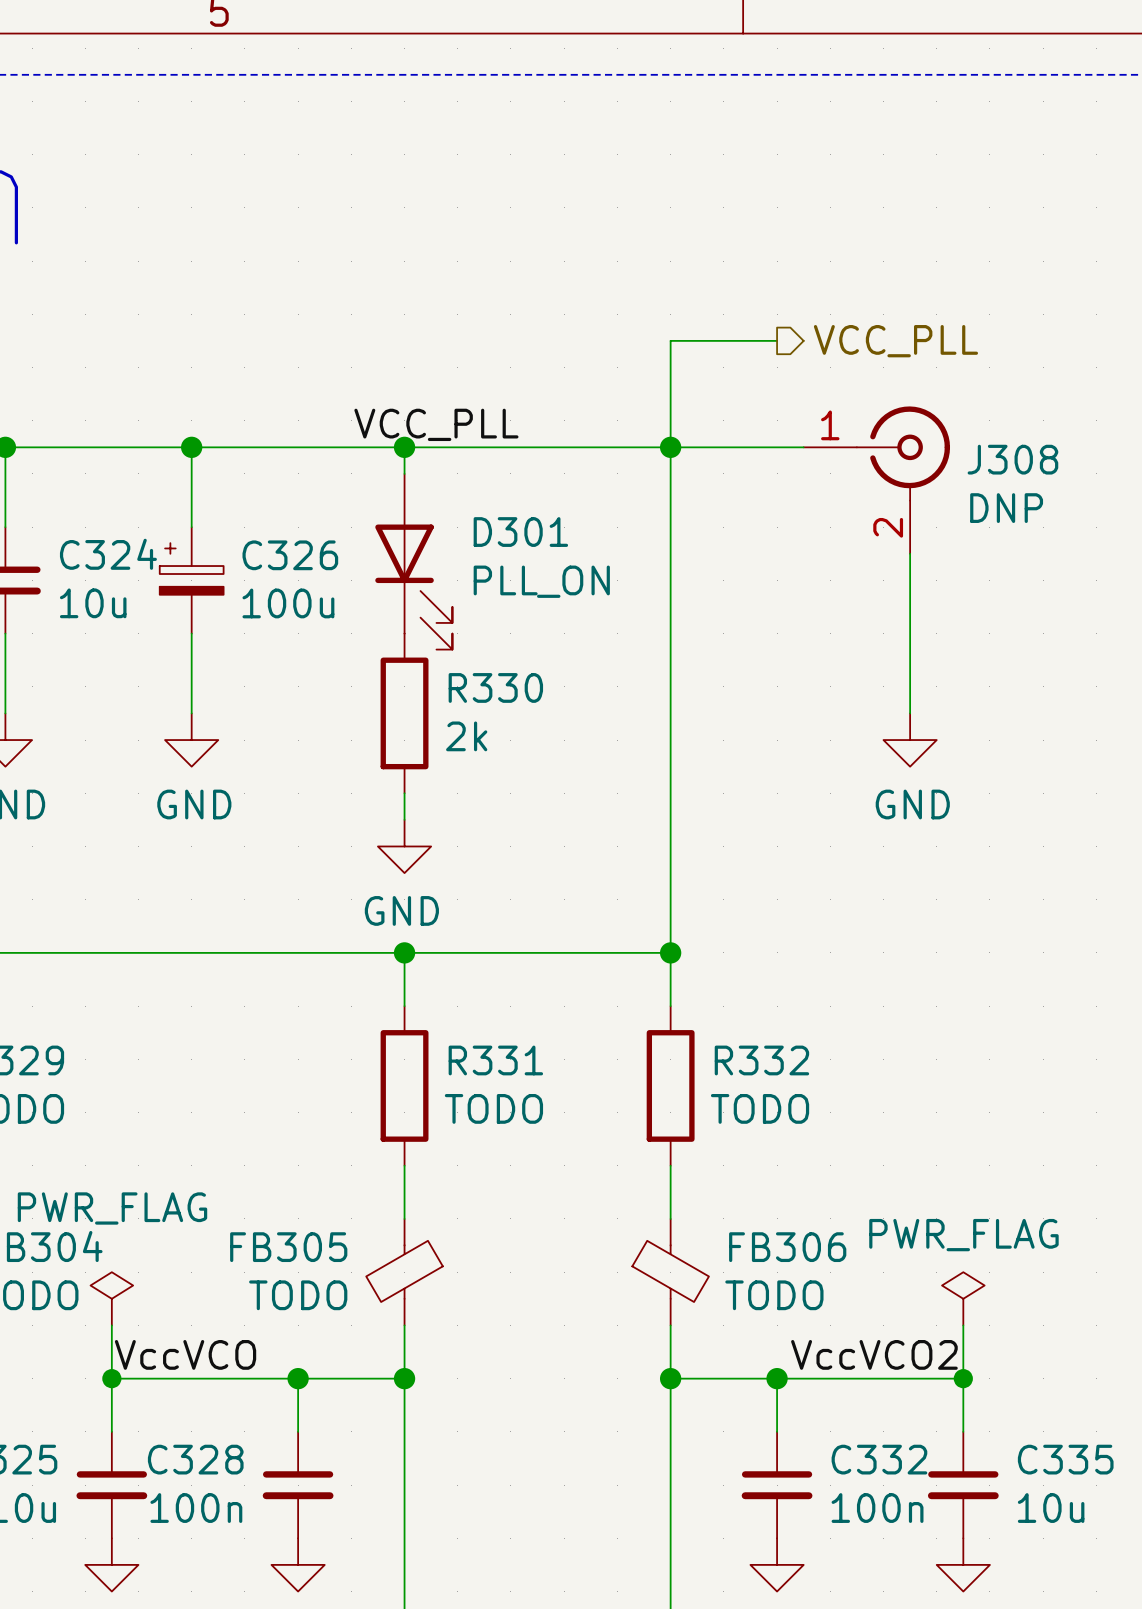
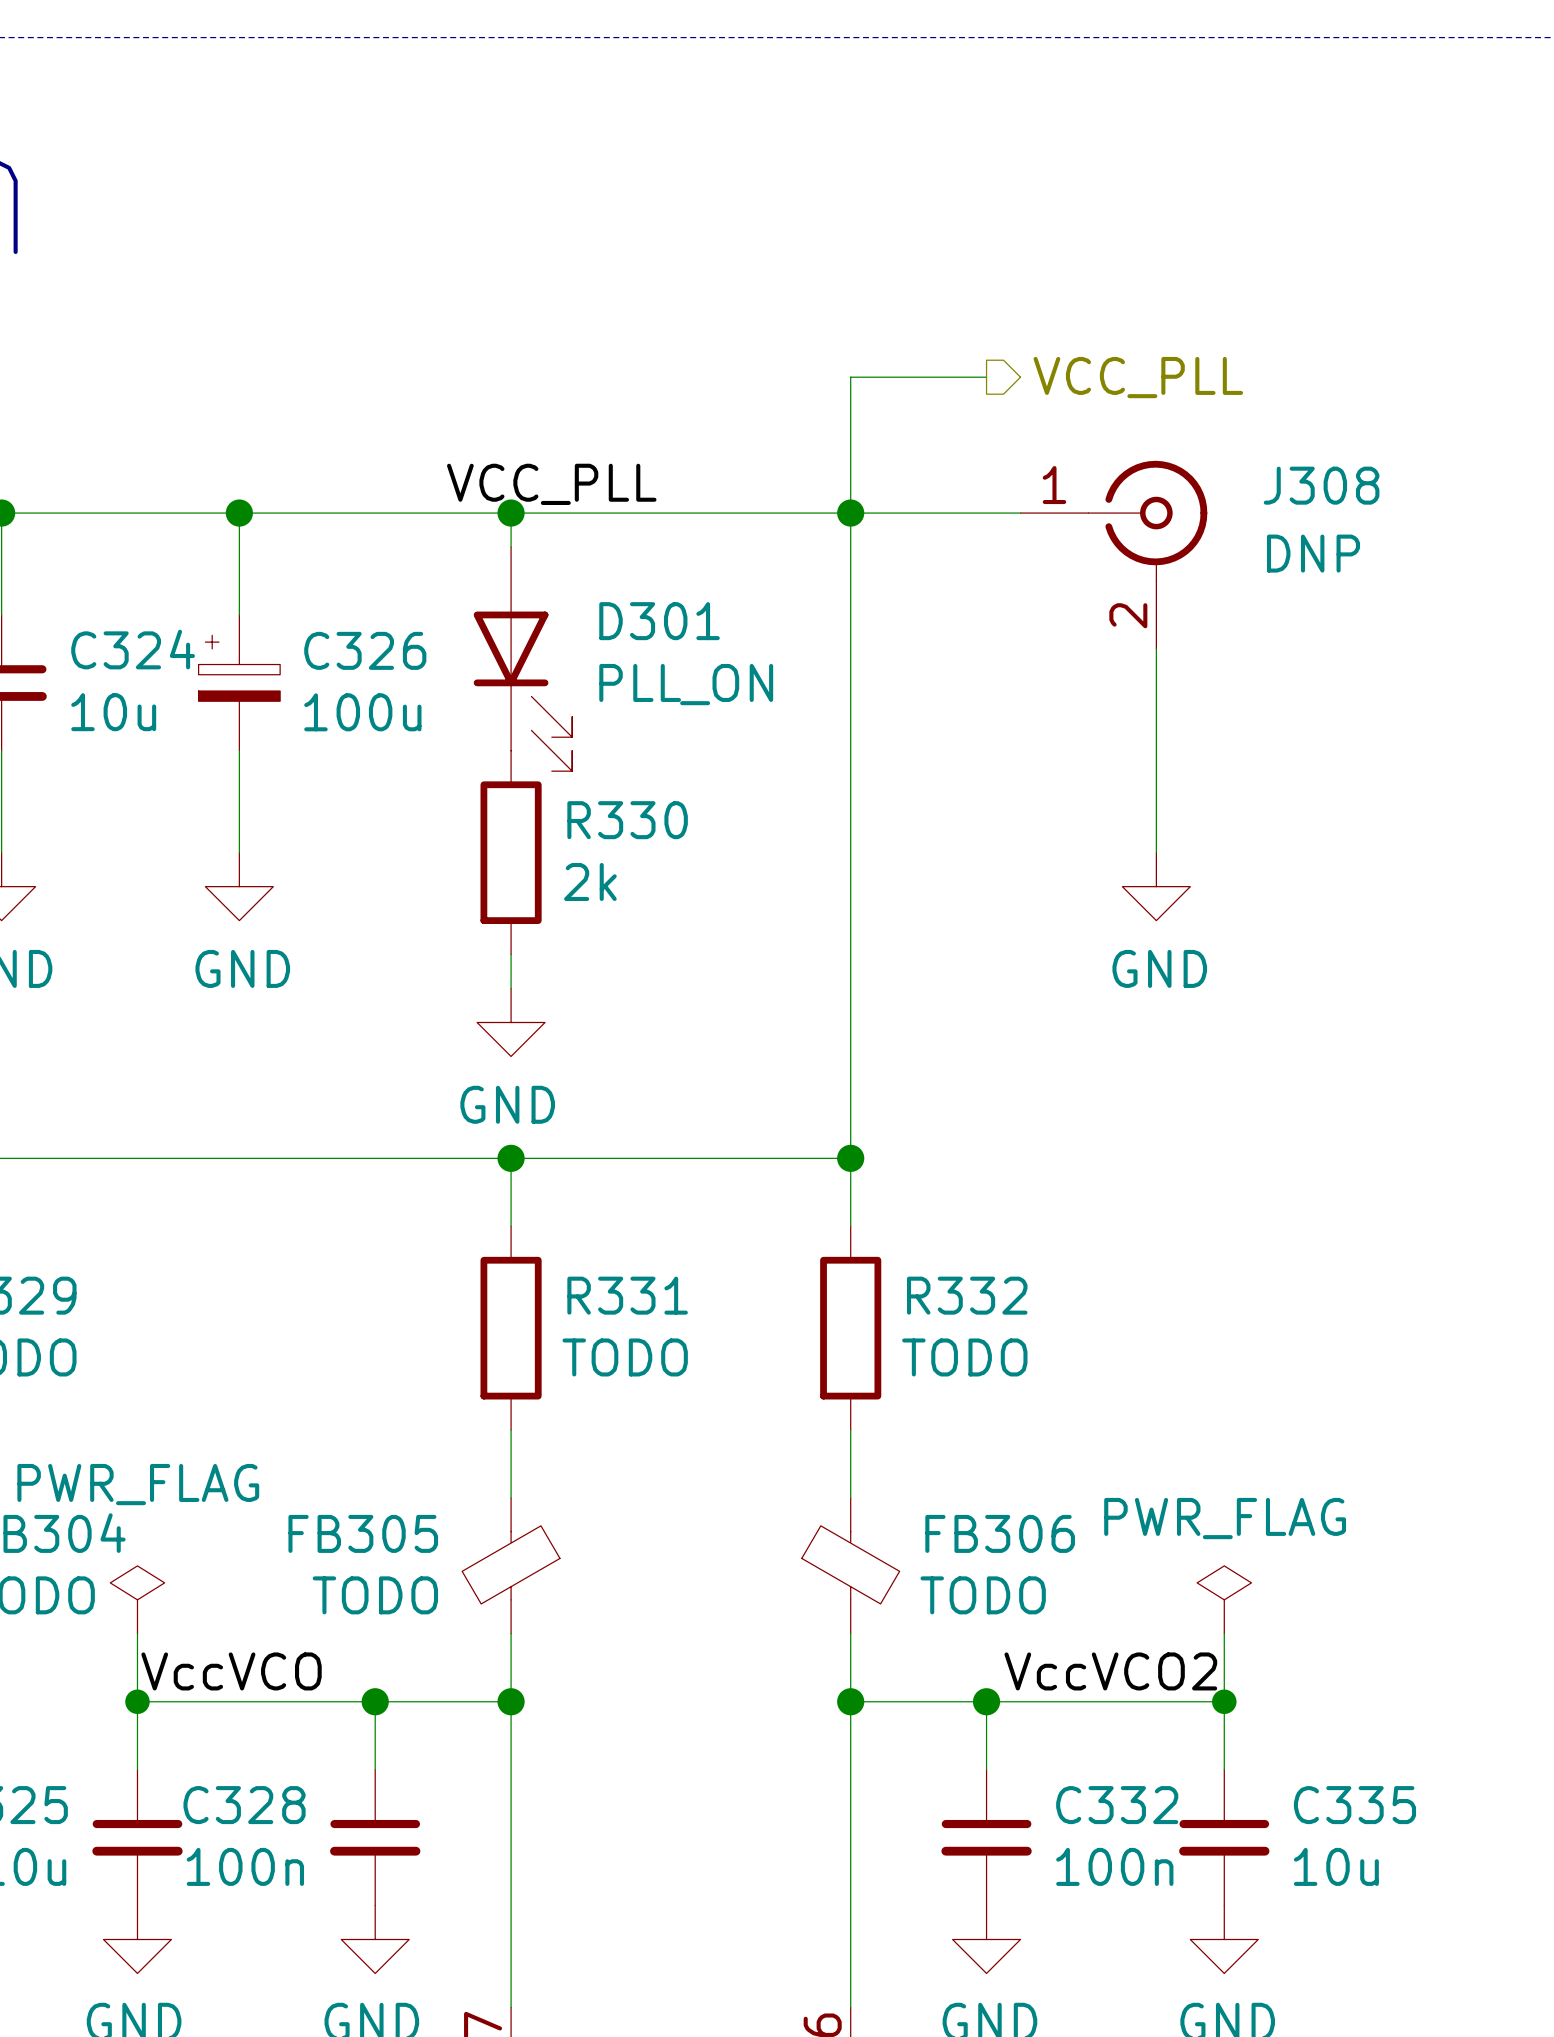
J308 name position: J308 (1012, 459) -> J308 (1321, 485)
J308 value position: DNP (1006, 508) -> DNP (1313, 553)

